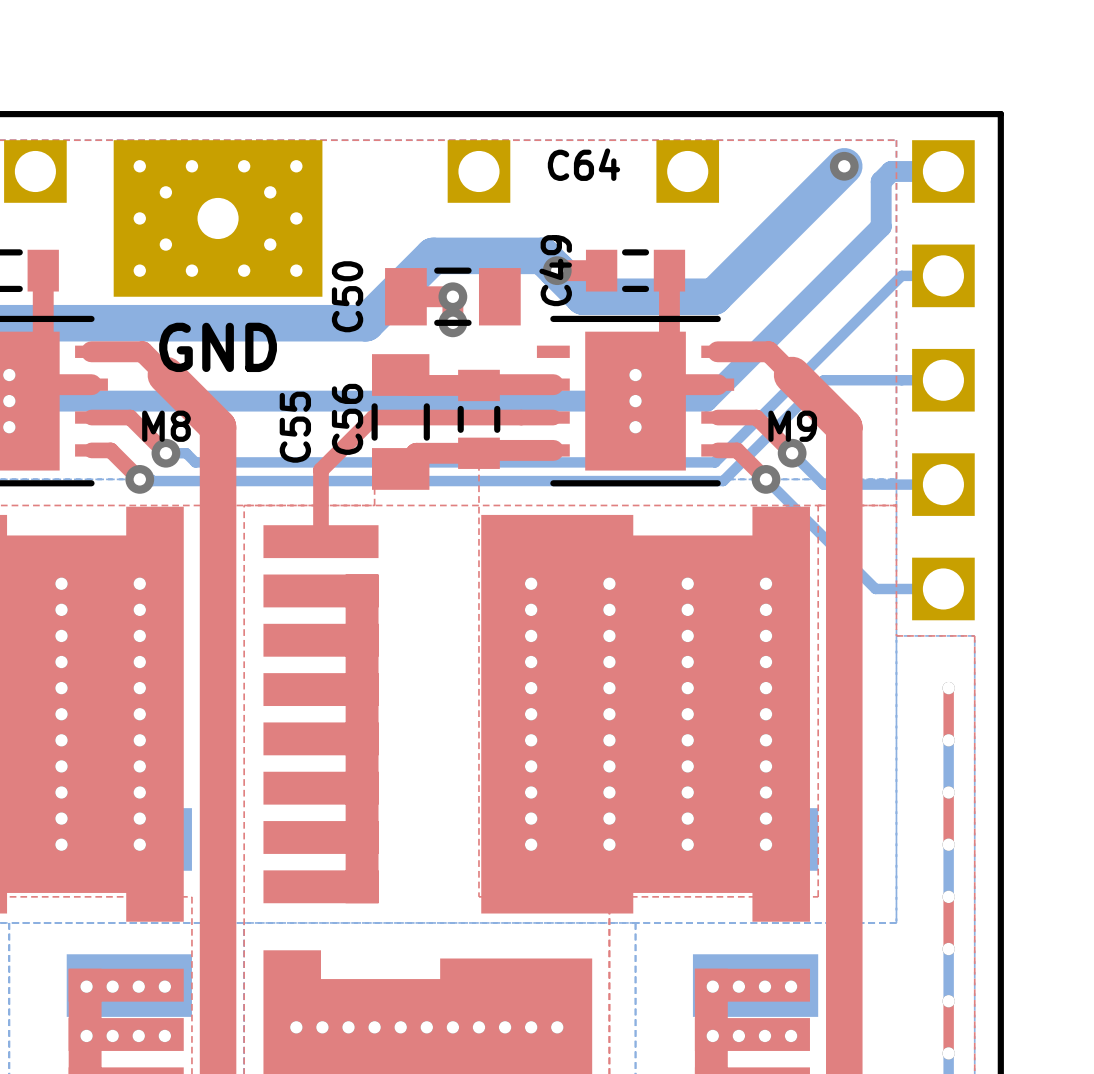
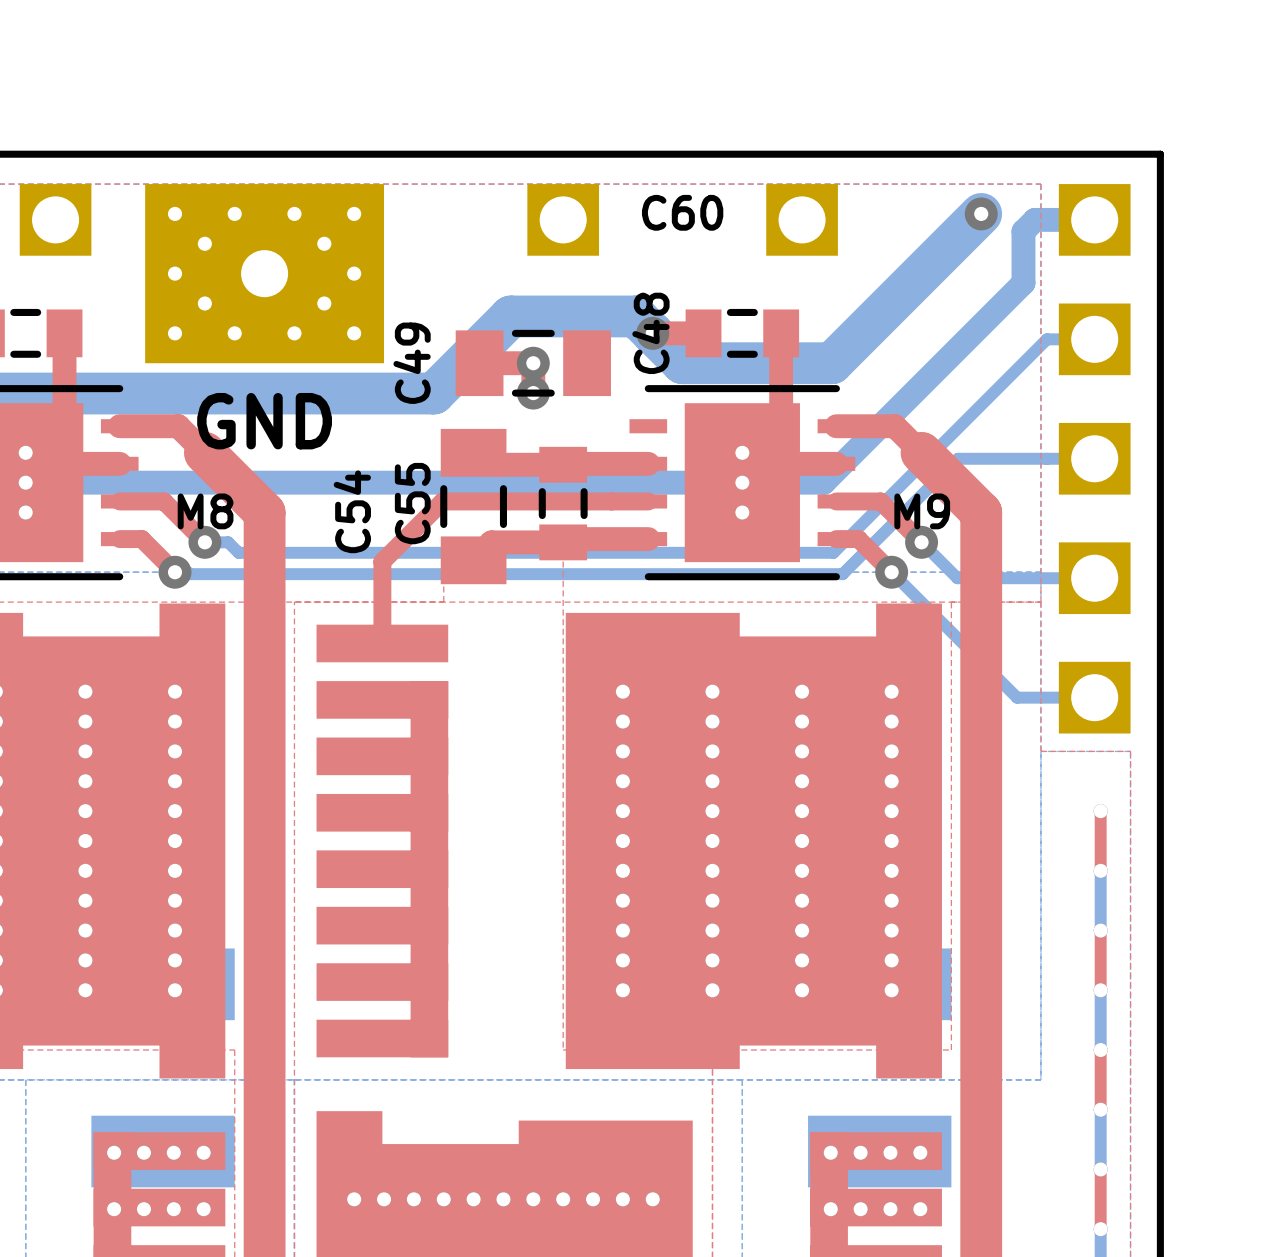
C64 name: C64 (583, 164) -> C60 (682, 212)
C49 name: C49 (555, 270) -> C48 (650, 333)
C50 name: C50 (347, 296) -> C49 (412, 363)
C56 name: C56 (347, 419) -> C55 (412, 503)
C55 name: C55 (295, 427) -> C54 (352, 511)

